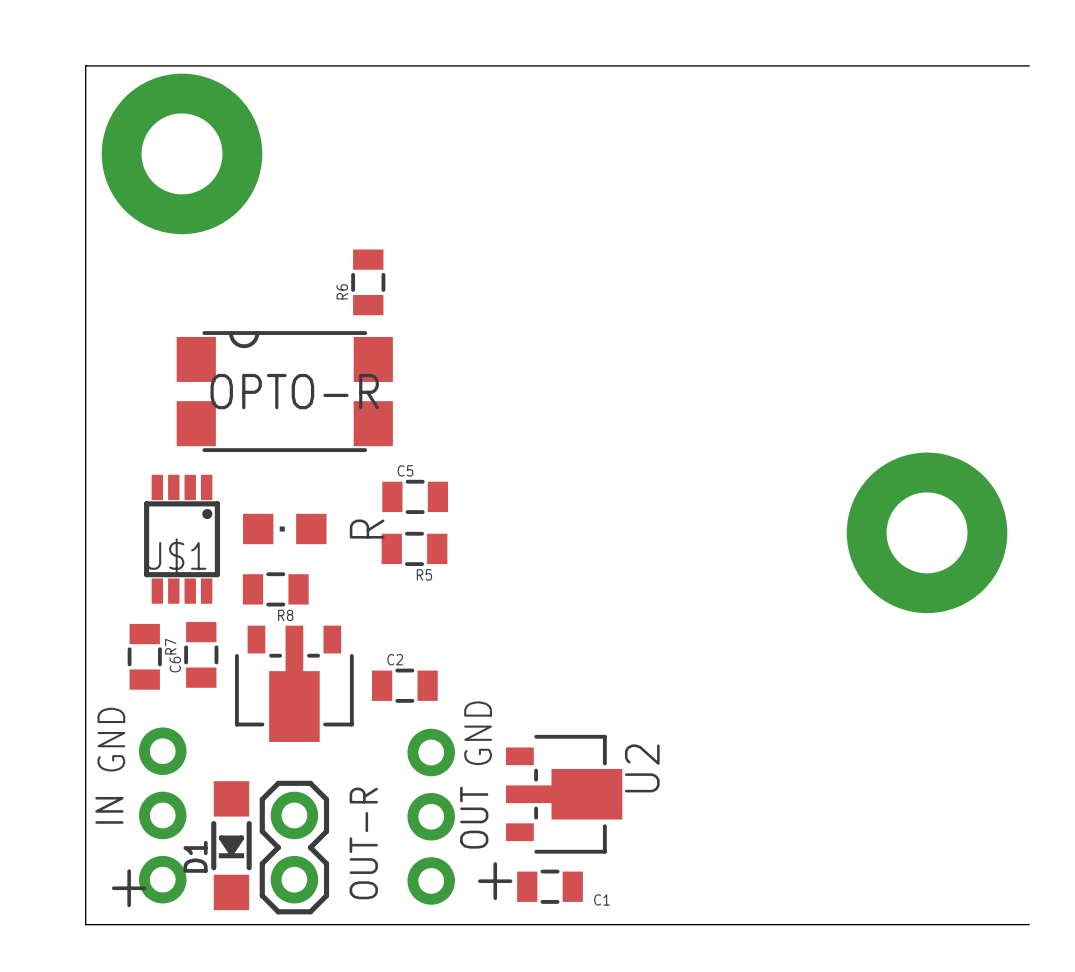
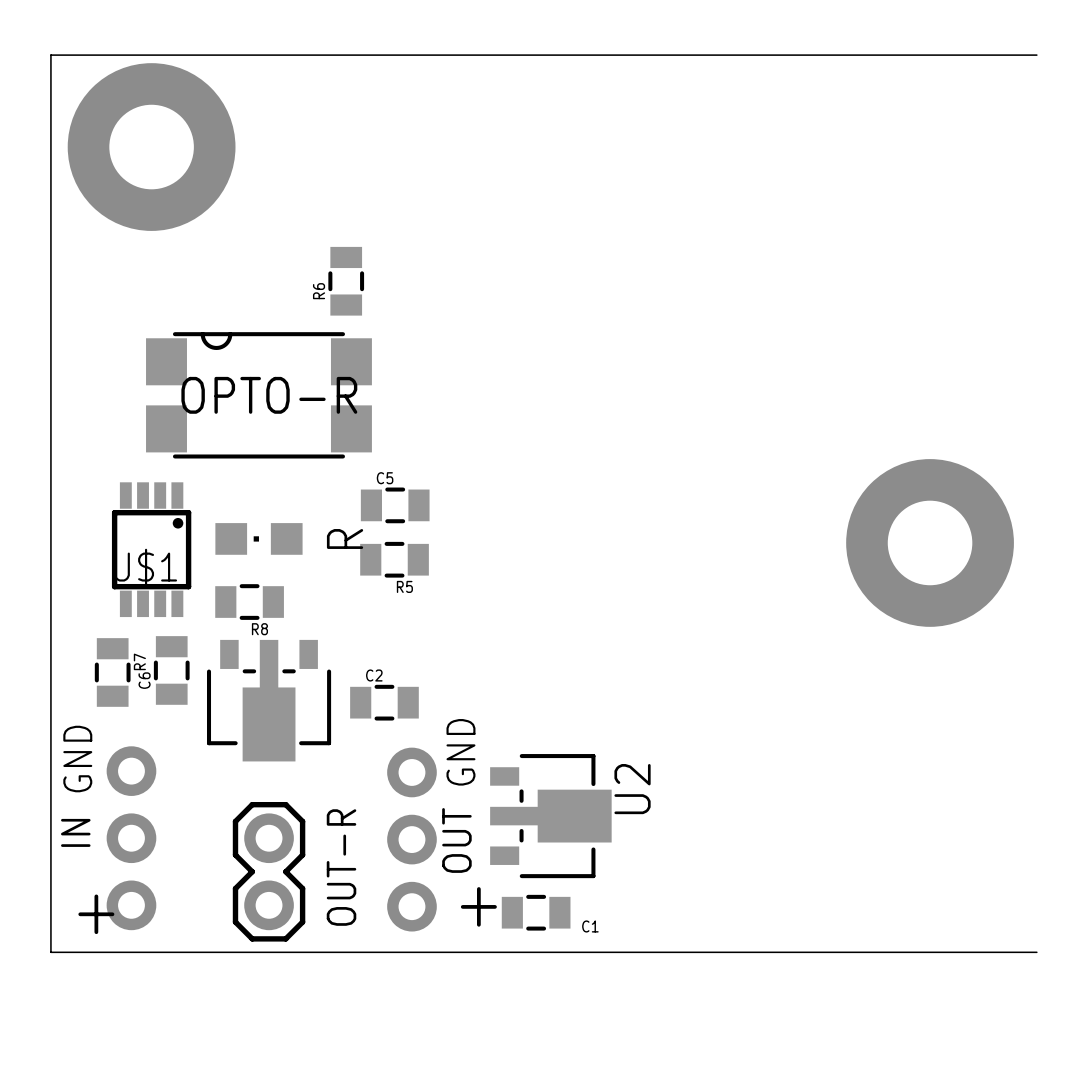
D1: (231, 845) -> none

